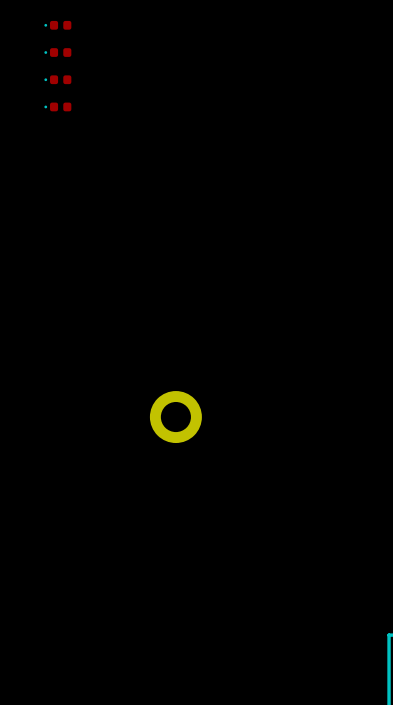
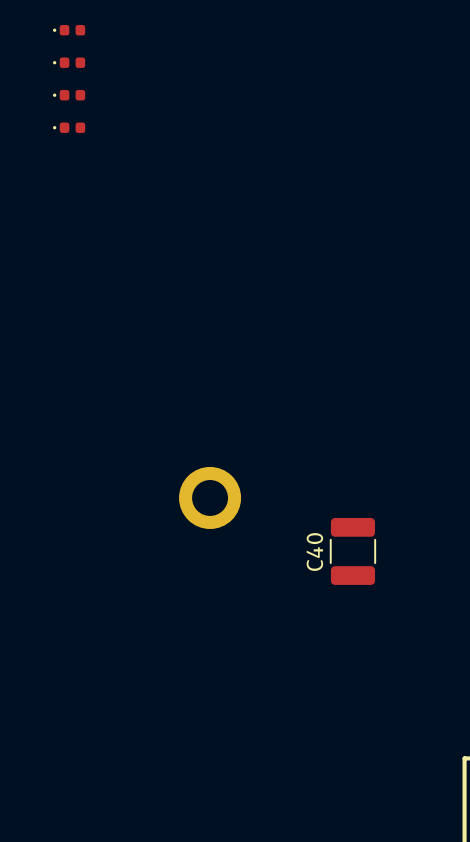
C40: none -> (352, 551)

